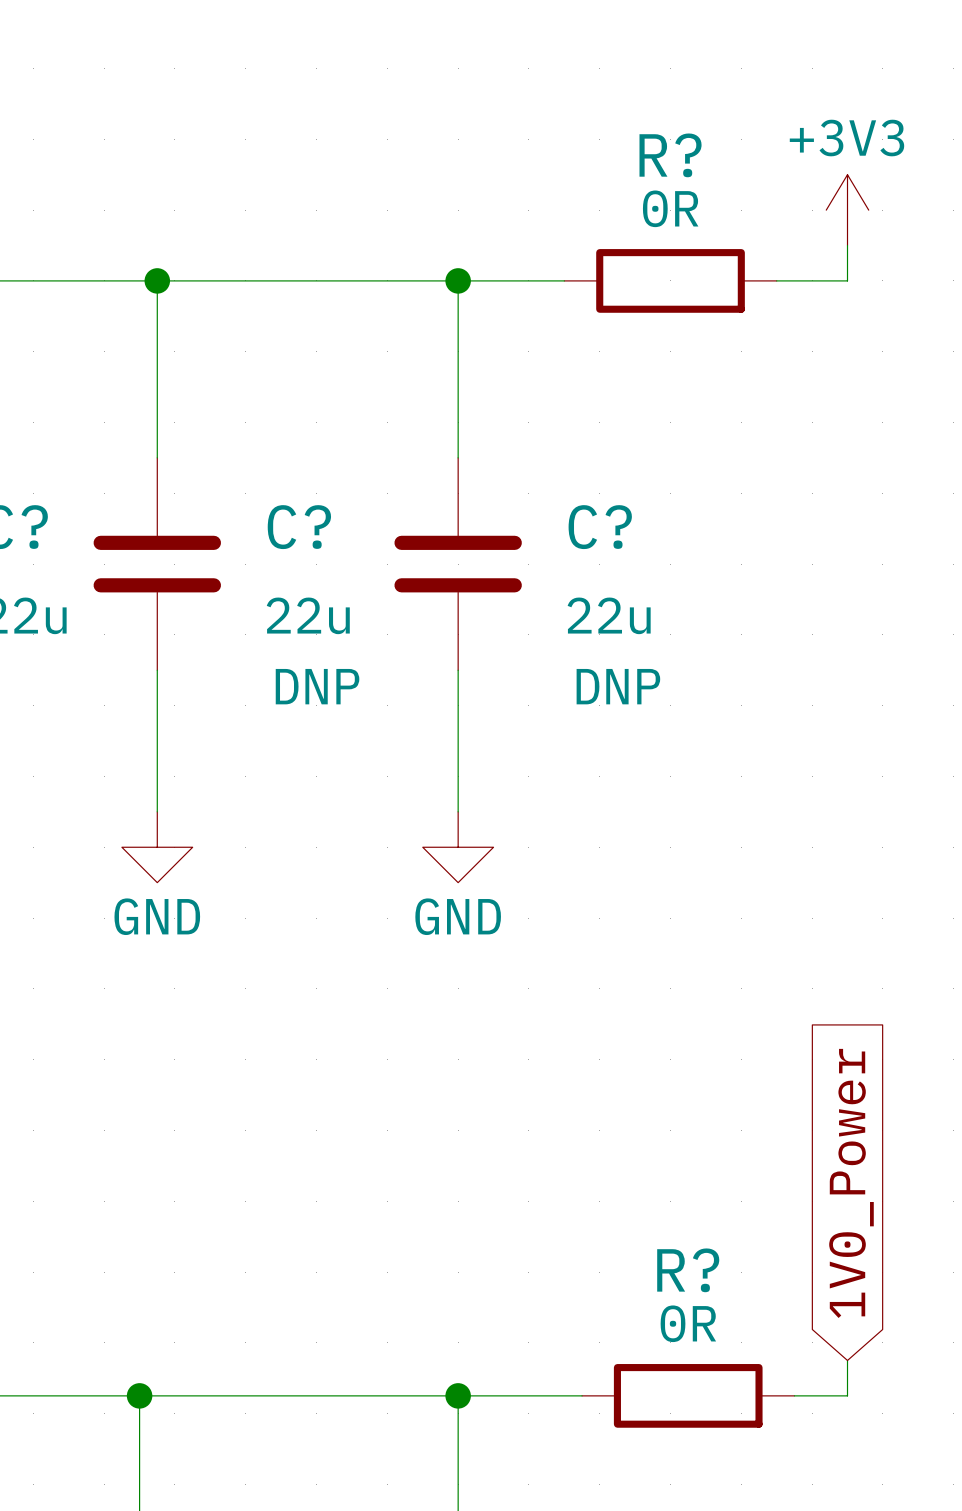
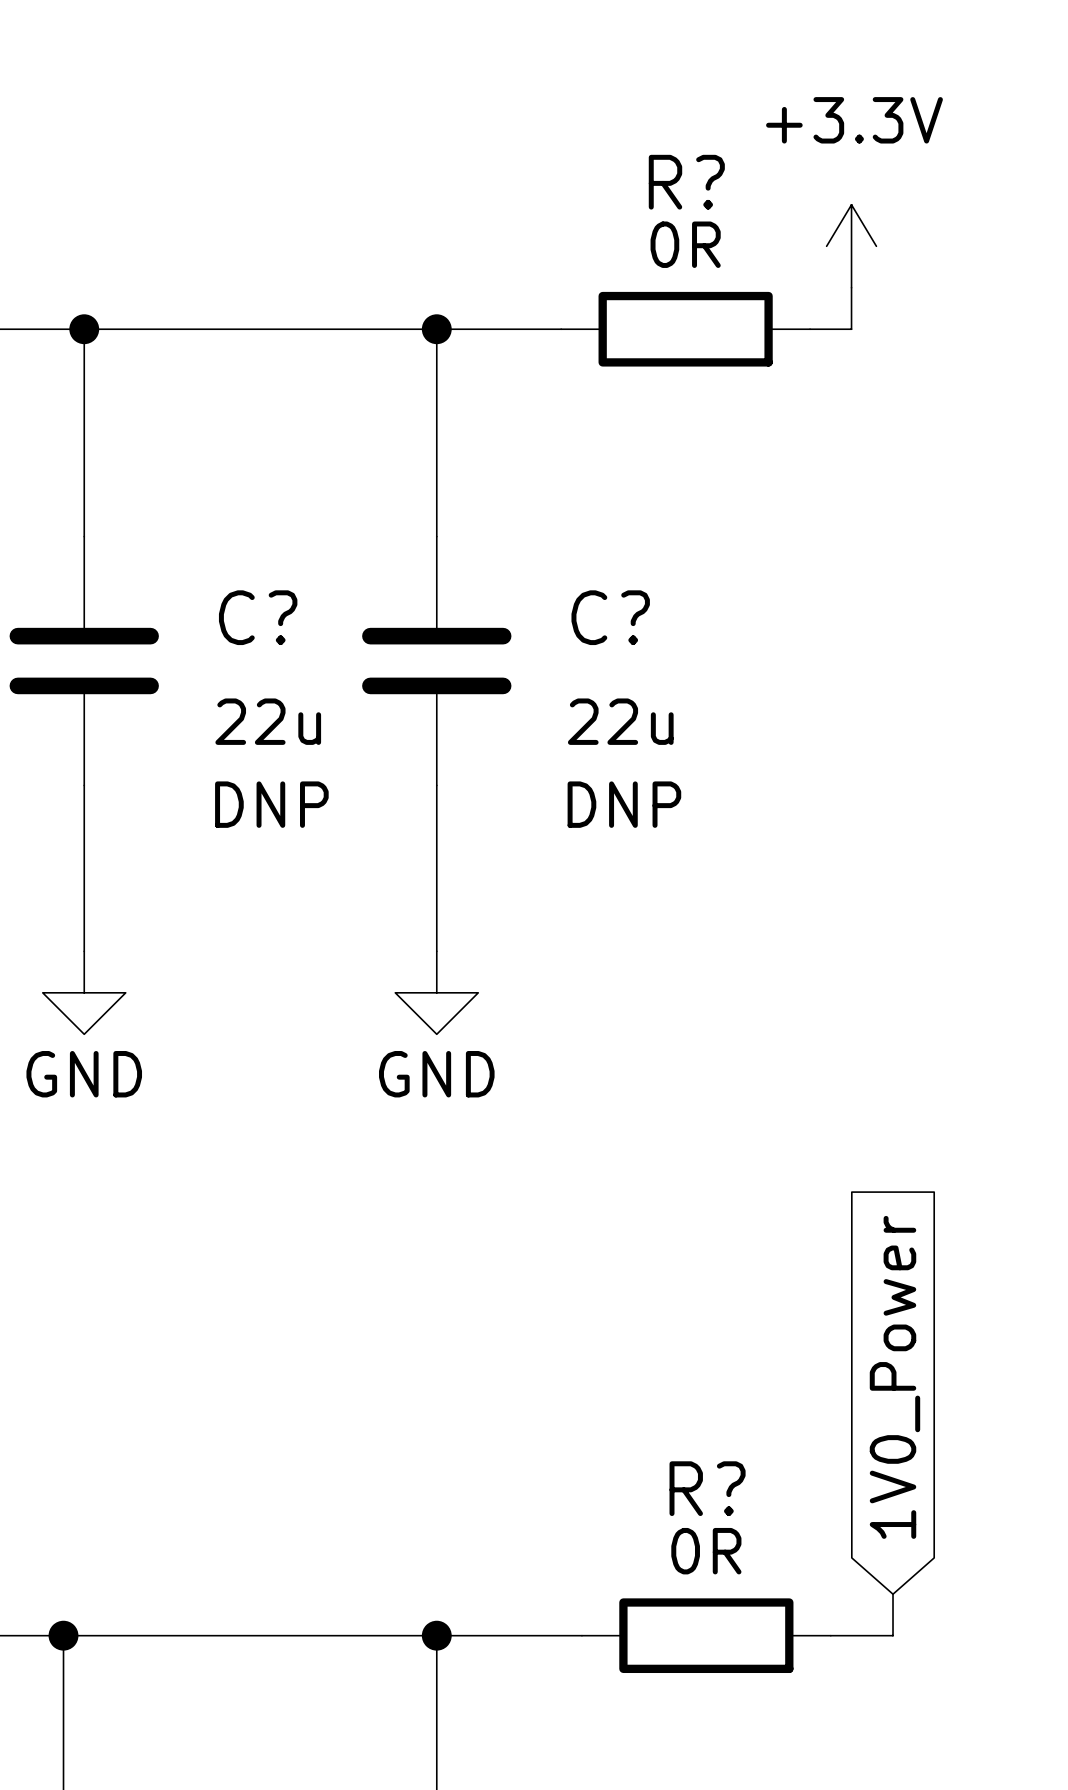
power symbol: none -> +3.3V (851, 246)
power symbol: +3V3 (847, 210) -> none
wire: (847, 245) (847, 280) (812, 280) -> (851, 287) (851, 329)

